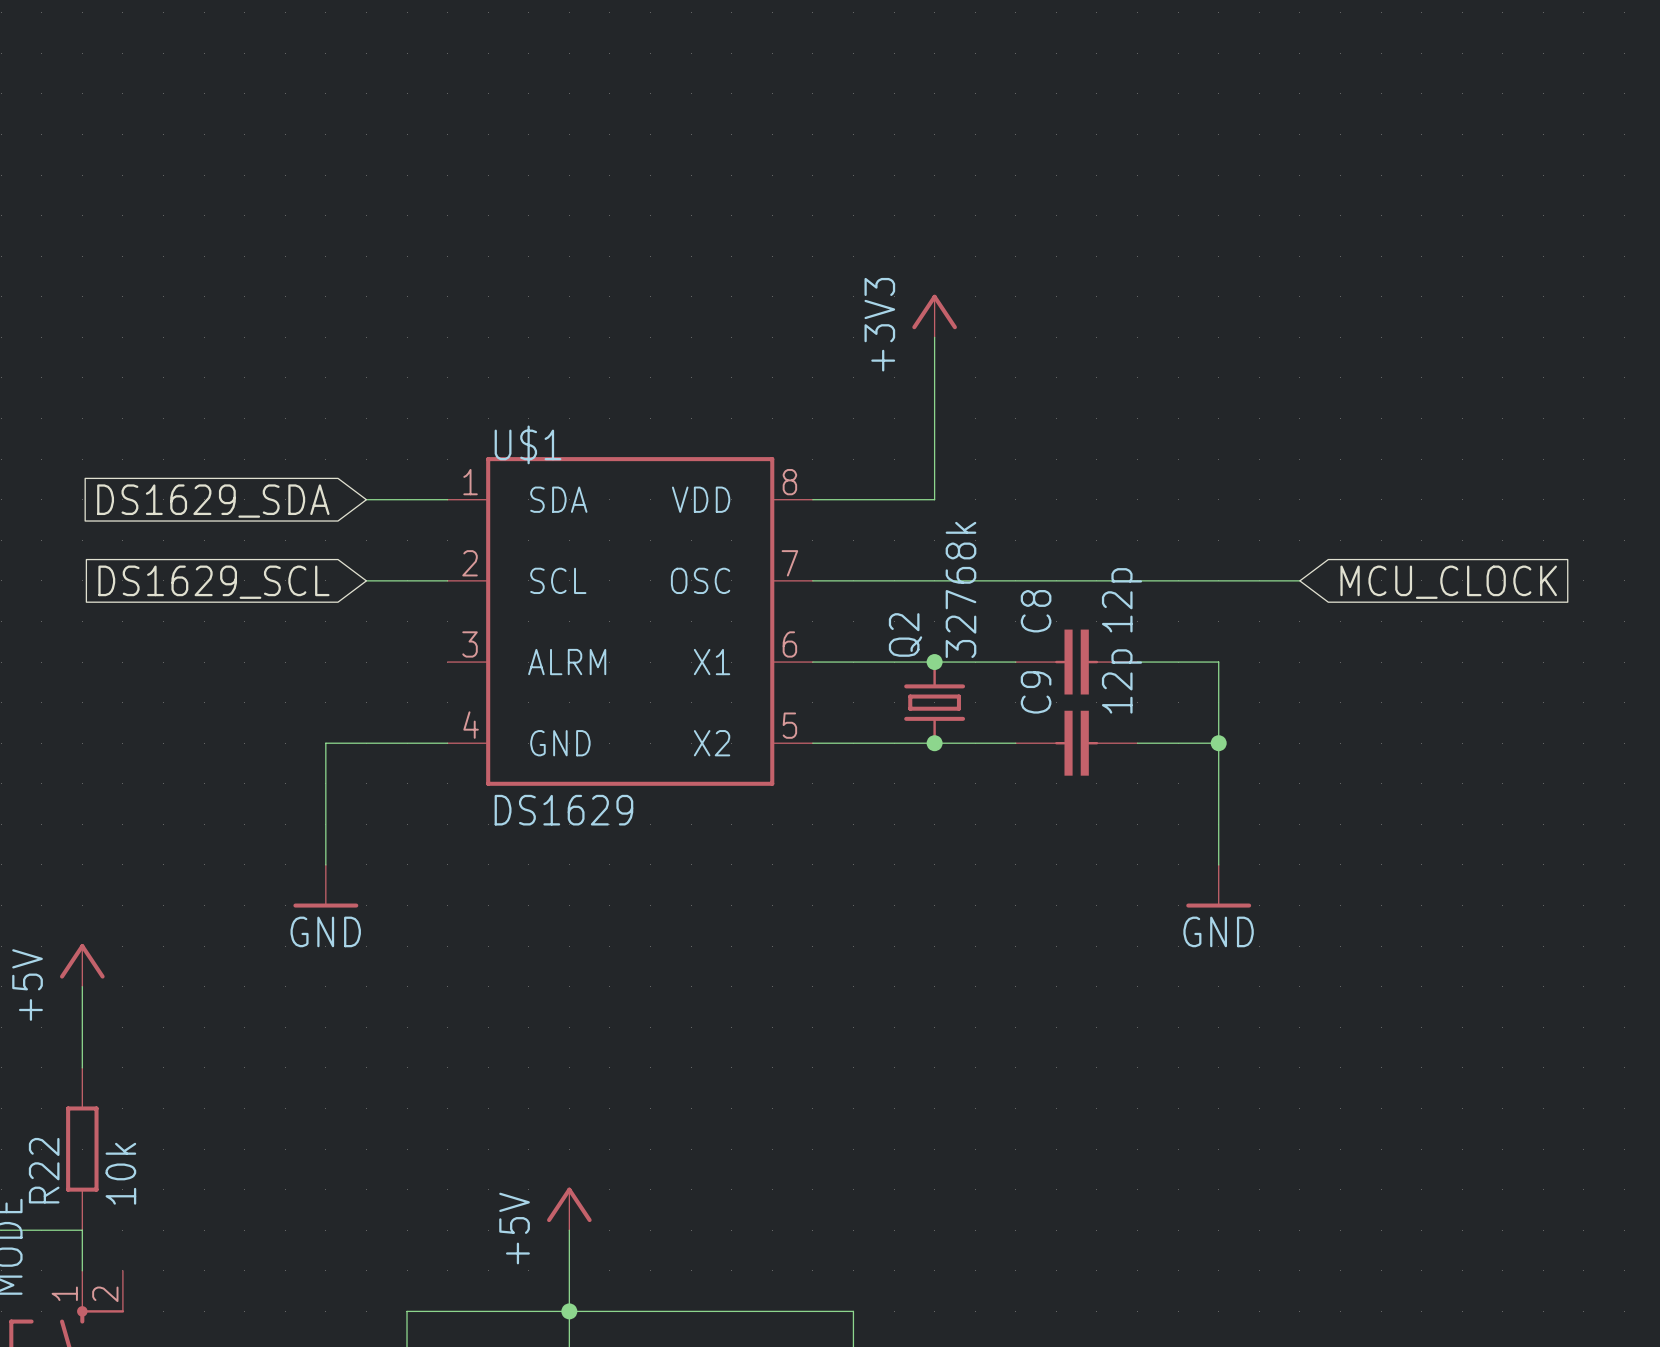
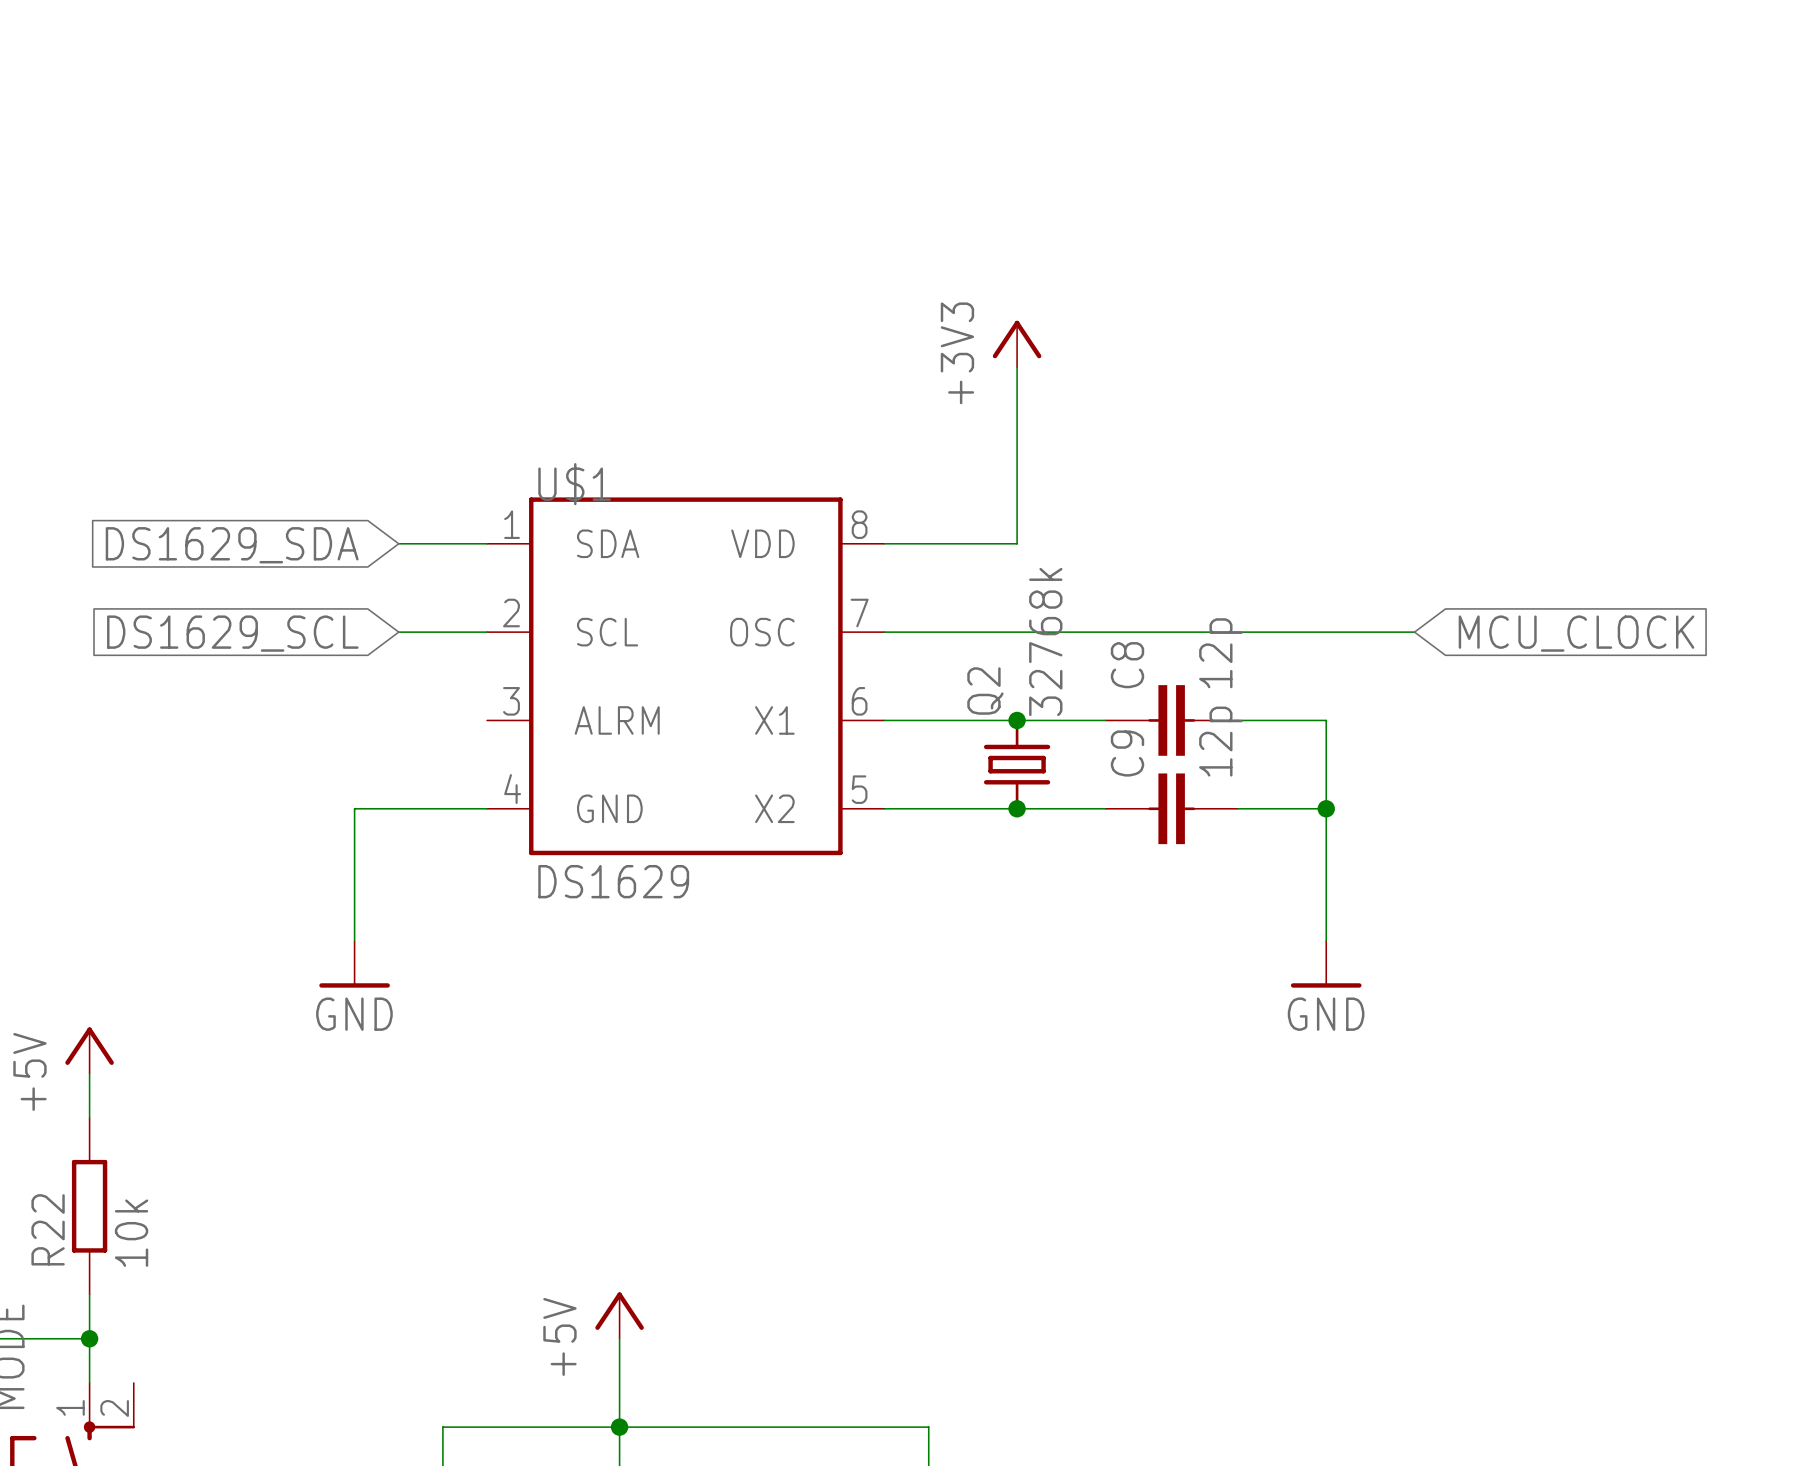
R22 position: (82, 1149) -> (89, 1206)
junction: none -> (89, 1338)

